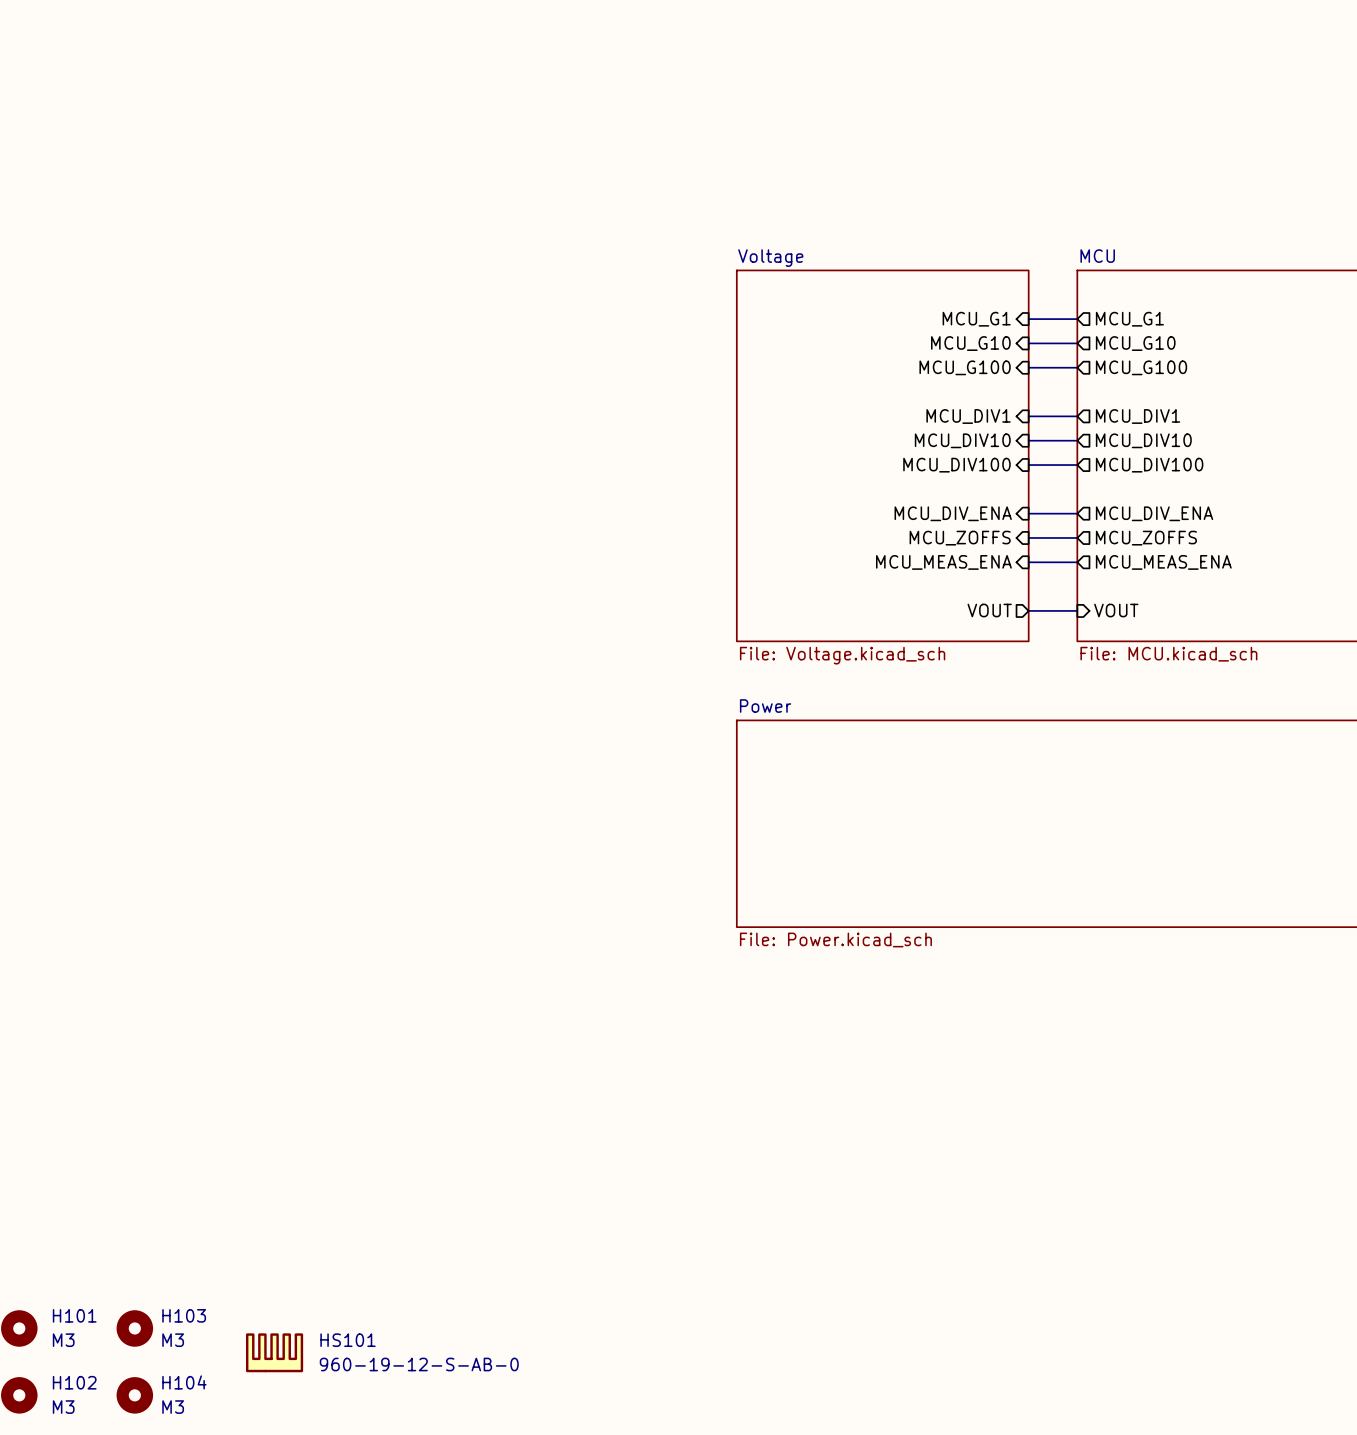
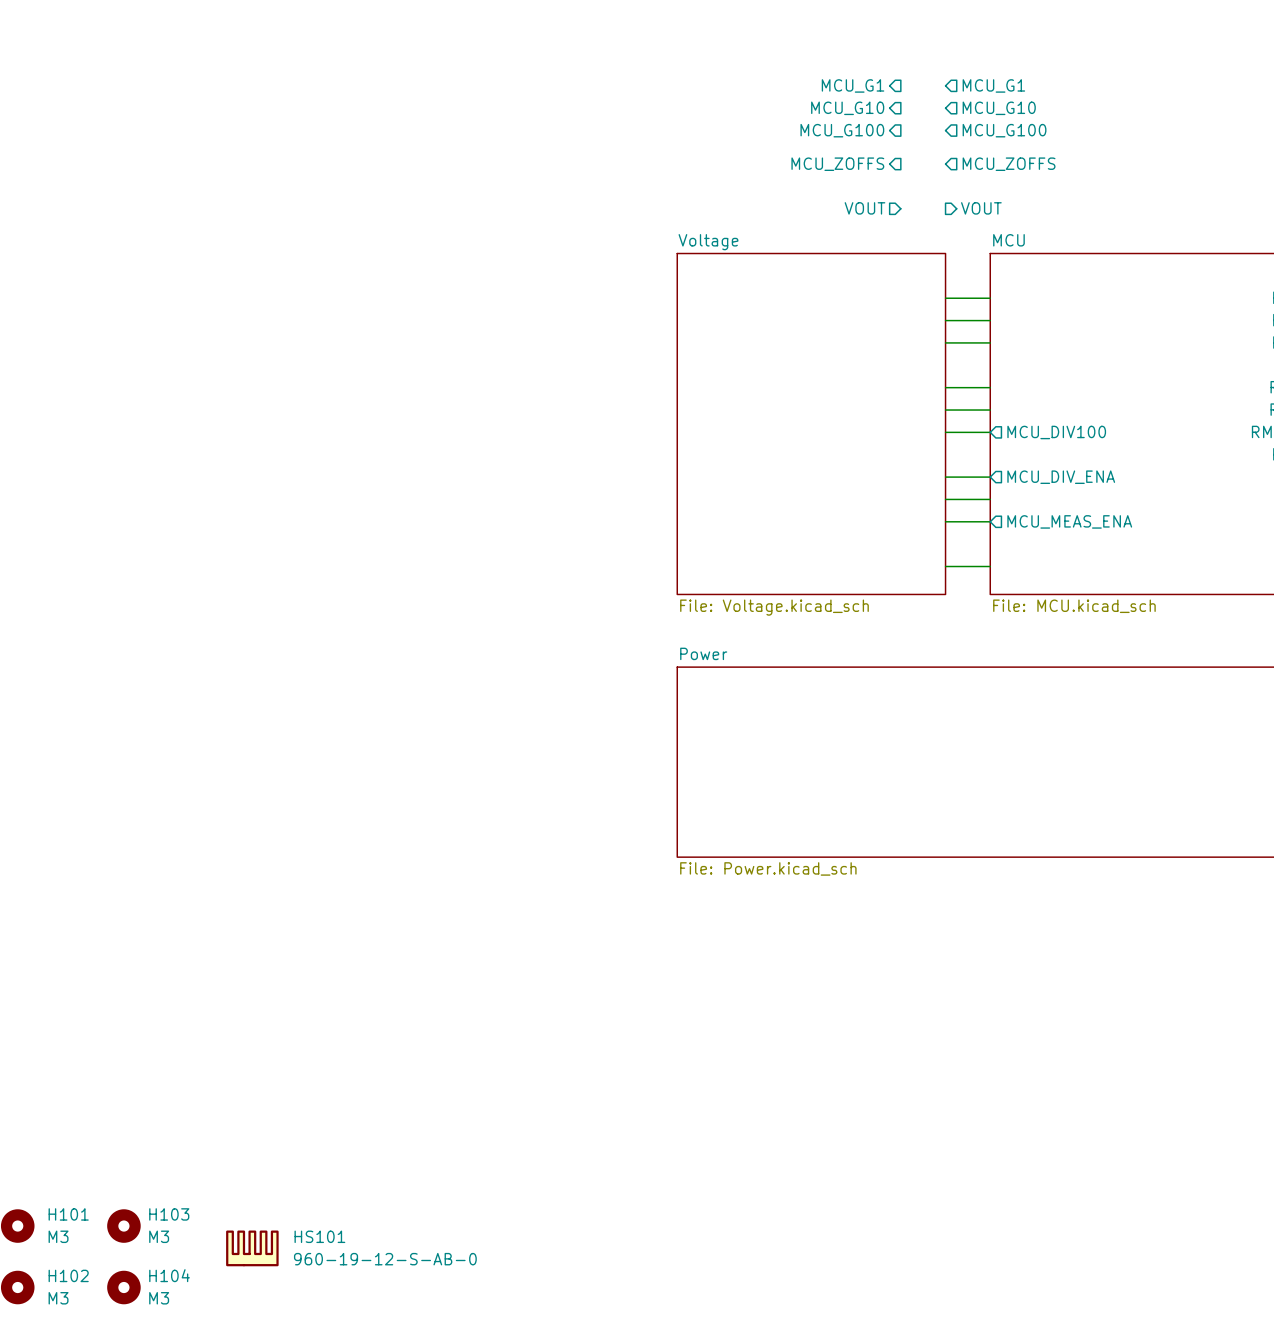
sheet pin: none -> MCU_G1 (853, 85)
sheet pin: none -> MCU_G1 (993, 85)
sheet pin: none -> MCU_G10 (847, 108)
sheet pin: none -> MCU_G10 (999, 108)
sheet pin: none -> MCU_G100 (842, 130)
sheet pin: none -> MCU_G100 (1004, 130)
sheet pin: none -> MCU_ZOFFS (837, 164)
sheet pin: none -> MCU_ZOFFS (1009, 164)
sheet pin: none -> VOUT (864, 208)
sheet pin: none -> VOUT (981, 208)
sheet pin: MCU_G1 (976, 319) -> none
sheet pin: MCU_G1 (1129, 319) -> none
sheet pin: MCU_G10 (970, 343) -> none
sheet pin: MCU_G10 (1135, 343) -> none
sheet pin: MCU_G100 (965, 367) -> none
sheet pin: MCU_G100 (1141, 367) -> none
sheet pin: MCU_DIV1 (968, 416) -> none
sheet pin: MCU_DIV1 (1138, 416) -> none
sheet pin: MCU_DIV10 (962, 440) -> none
sheet pin: MCU_DIV10 (1143, 440) -> none
sheet pin: MCU_DIV100 (956, 465) -> none
sheet pin: MCU_DIV_ENA (953, 513) -> none
sheet pin: MCU_ZOFFS (960, 538) -> none
sheet pin: MCU_ZOFFS (1146, 538) -> none
sheet pin: MCU_MEAS_ENA (943, 562) -> none
sheet pin: VOUT (989, 610) -> none
sheet pin: VOUT (1116, 610) -> none

